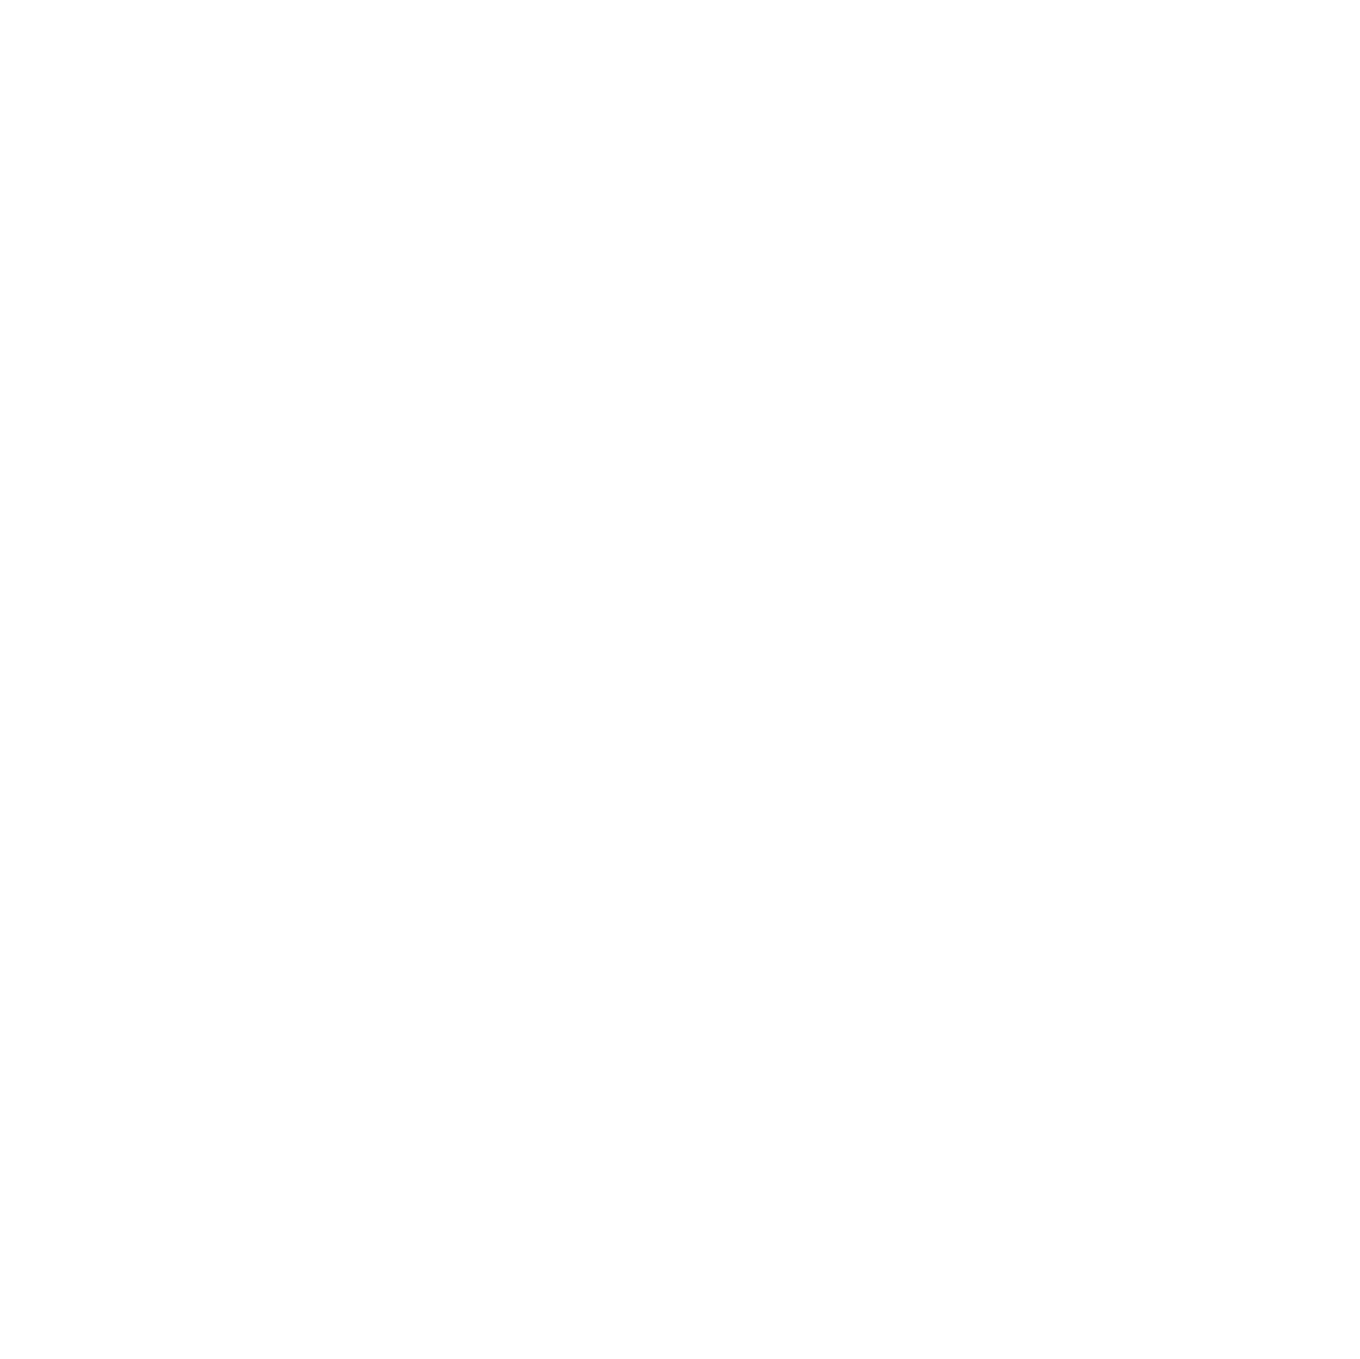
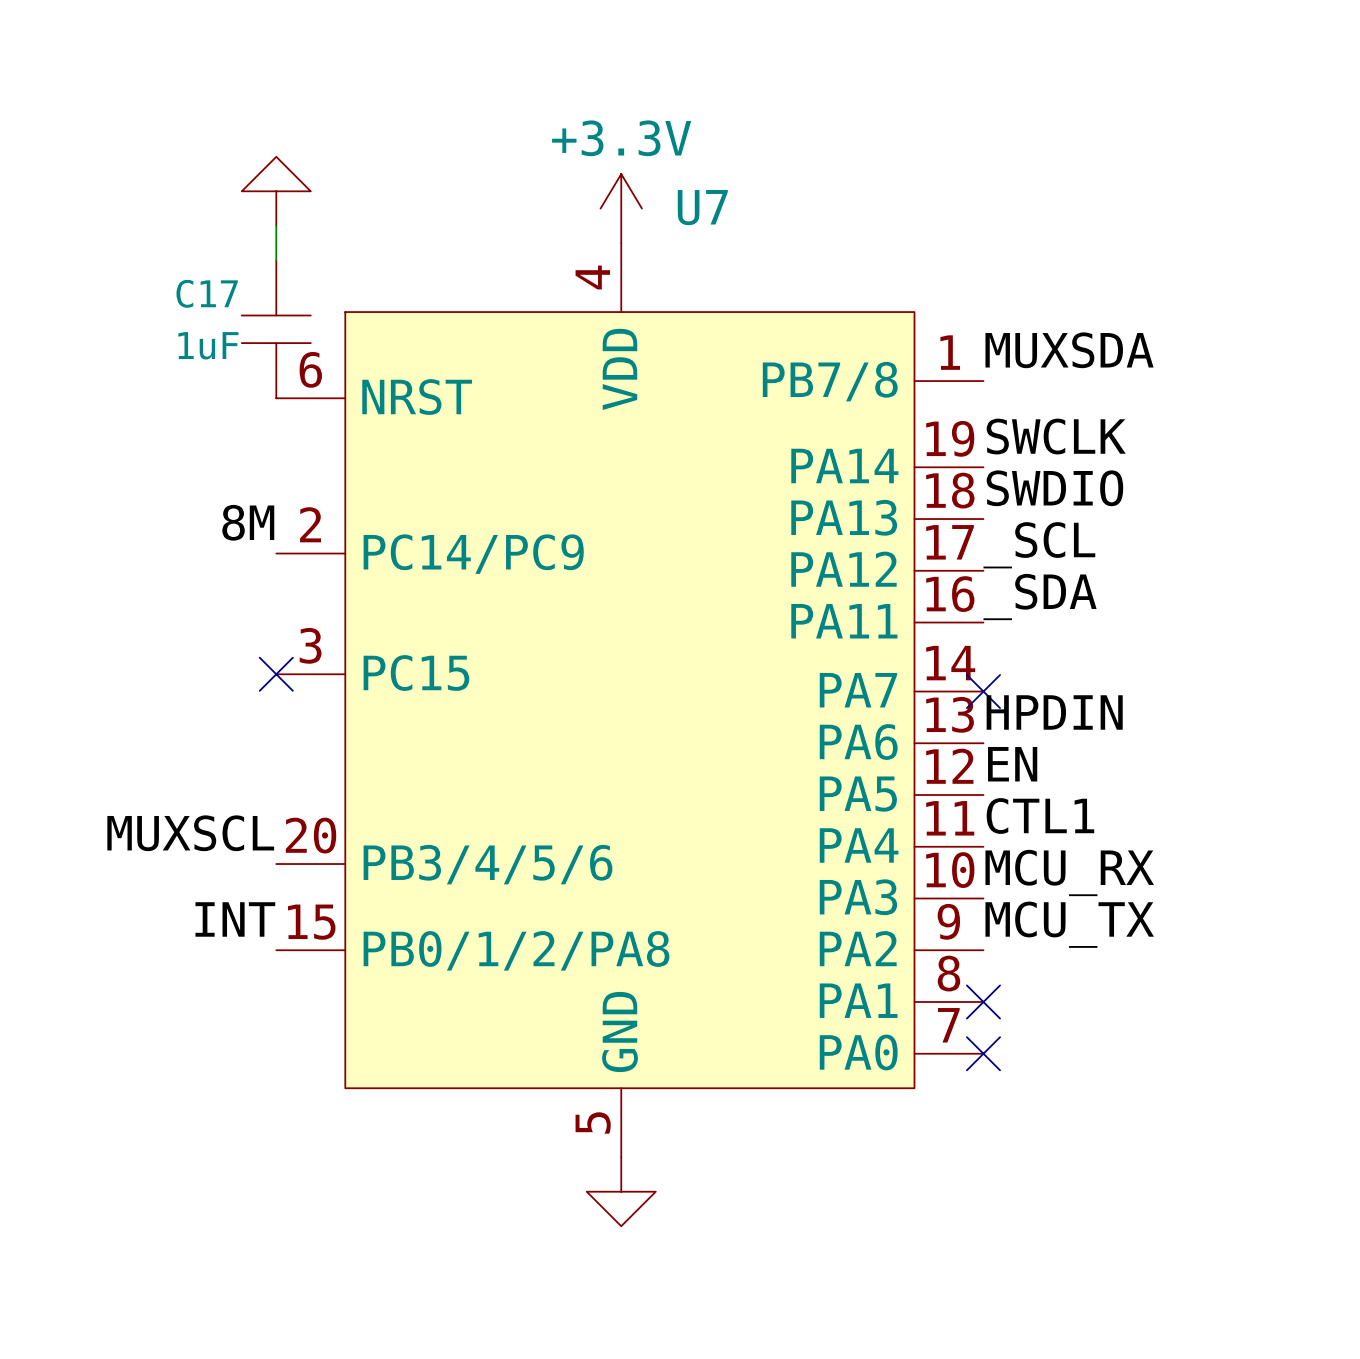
power symbol: none -> (276, 191)
power symbol: none -> +3.3V (621, 208)
wire: none -> (276, 225) (276, 260)
C17: none -> 1uF (276, 329)
label: none -> MUXSDA (1069, 350)
label: none -> SWCLK (1056, 436)
label: none -> SWDIO (1054, 488)
label: none -> 8M (248, 522)
label: none -> _SCL (1039, 545)
label: none -> _SDA (1040, 597)
no-connect mark: none -> (276, 674)
no-connect mark: none -> (983, 691)
U7: none -> (629, 700)
label: none -> HPDIN (1054, 712)
label: none -> EN (1012, 764)
label: none -> CTL1 (1040, 816)
label: none -> MUXSCL (190, 833)
label: none -> MCU_RX (1069, 872)
label: none -> INT (235, 919)
label: none -> MCU_TX (1069, 924)
no-connect mark: none -> (983, 1001)
no-connect mark: none -> (983, 1053)
power symbol: none -> (621, 1191)

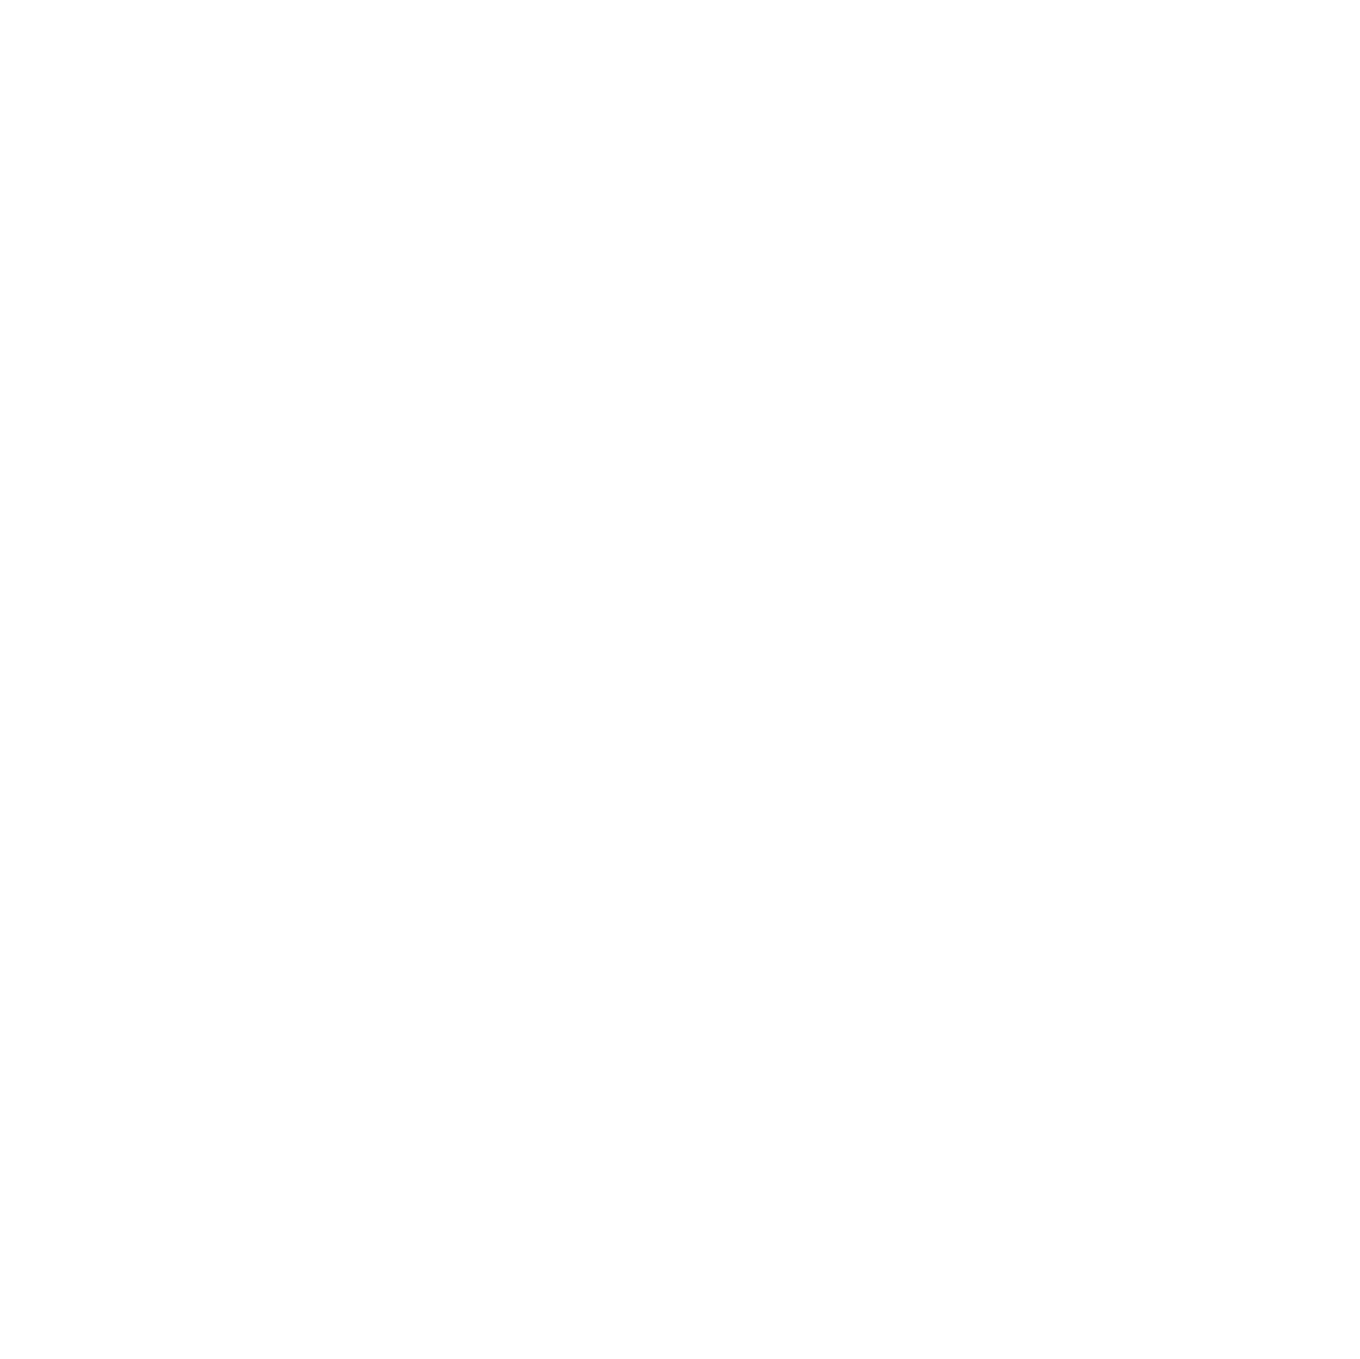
power symbol: (276, 191) -> none
power symbol: +3.3V (621, 208) -> none
wire: (276, 225) (276, 260) -> none
C17: 1uF (276, 329) -> none
label: MUXSDA (1069, 350) -> none
label: SWCLK (1056, 436) -> none
label: SWDIO (1054, 488) -> none
label: 8M (248, 522) -> none
label: _SCL (1039, 545) -> none
label: _SDA (1040, 597) -> none
no-connect mark: (276, 674) -> none
no-connect mark: (983, 691) -> none
U7: (629, 700) -> none
label: HPDIN (1054, 712) -> none
label: EN (1012, 764) -> none
label: CTL1 (1040, 816) -> none
label: MUXSCL (190, 833) -> none
label: MCU_RX (1069, 872) -> none
label: INT (235, 919) -> none
label: MCU_TX (1069, 924) -> none
no-connect mark: (983, 1001) -> none
no-connect mark: (983, 1053) -> none
power symbol: (621, 1191) -> none

